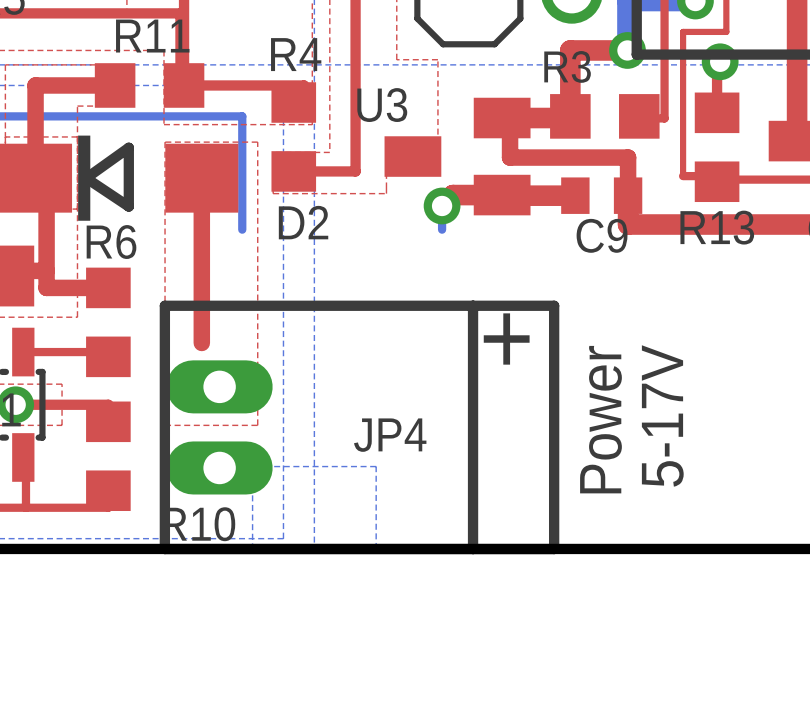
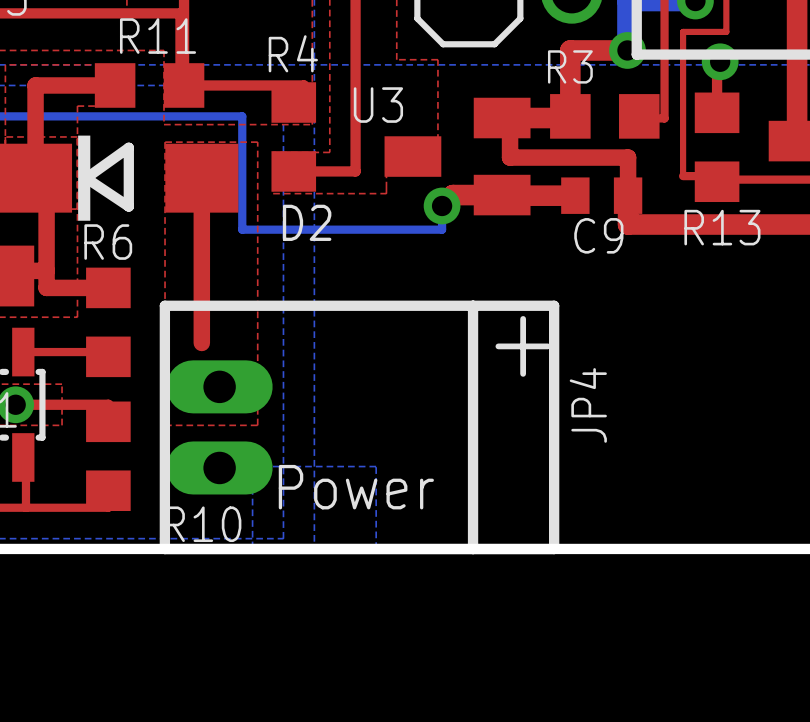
bottom track: none -> (242, 229) (442, 229)
text: 5-17V (662, 415) -> none
text rotation: 0° (600, 419) -> 90° clockwise (356, 487)
text position: Power (600, 419) -> Power (356, 487)
JP4 name rotation: 0° (390, 435) -> 90° counterclockwise (588, 405)
JP4 name position: JP4 (390, 435) -> JP4 (588, 405)

